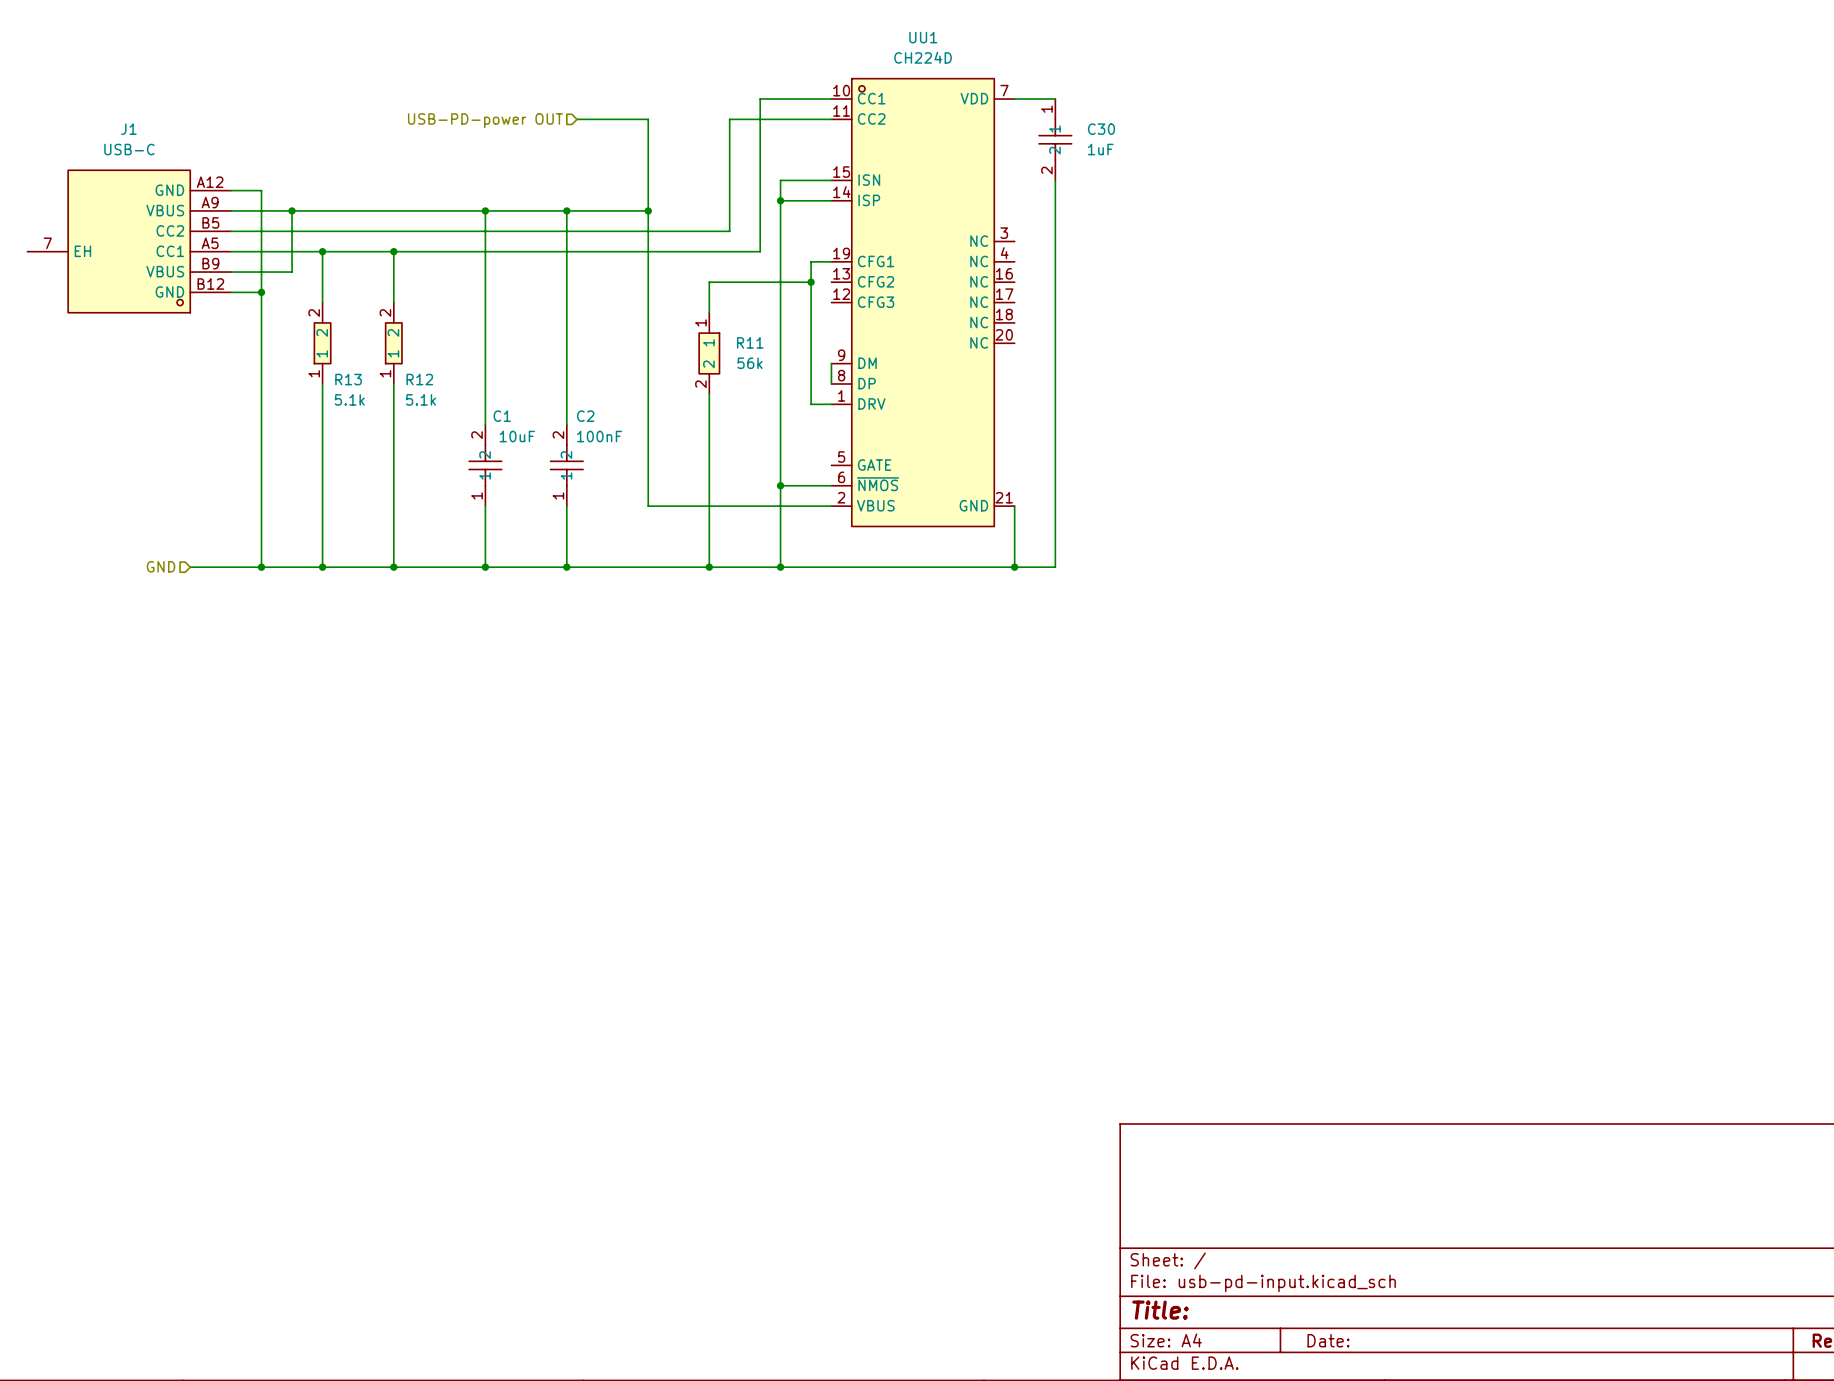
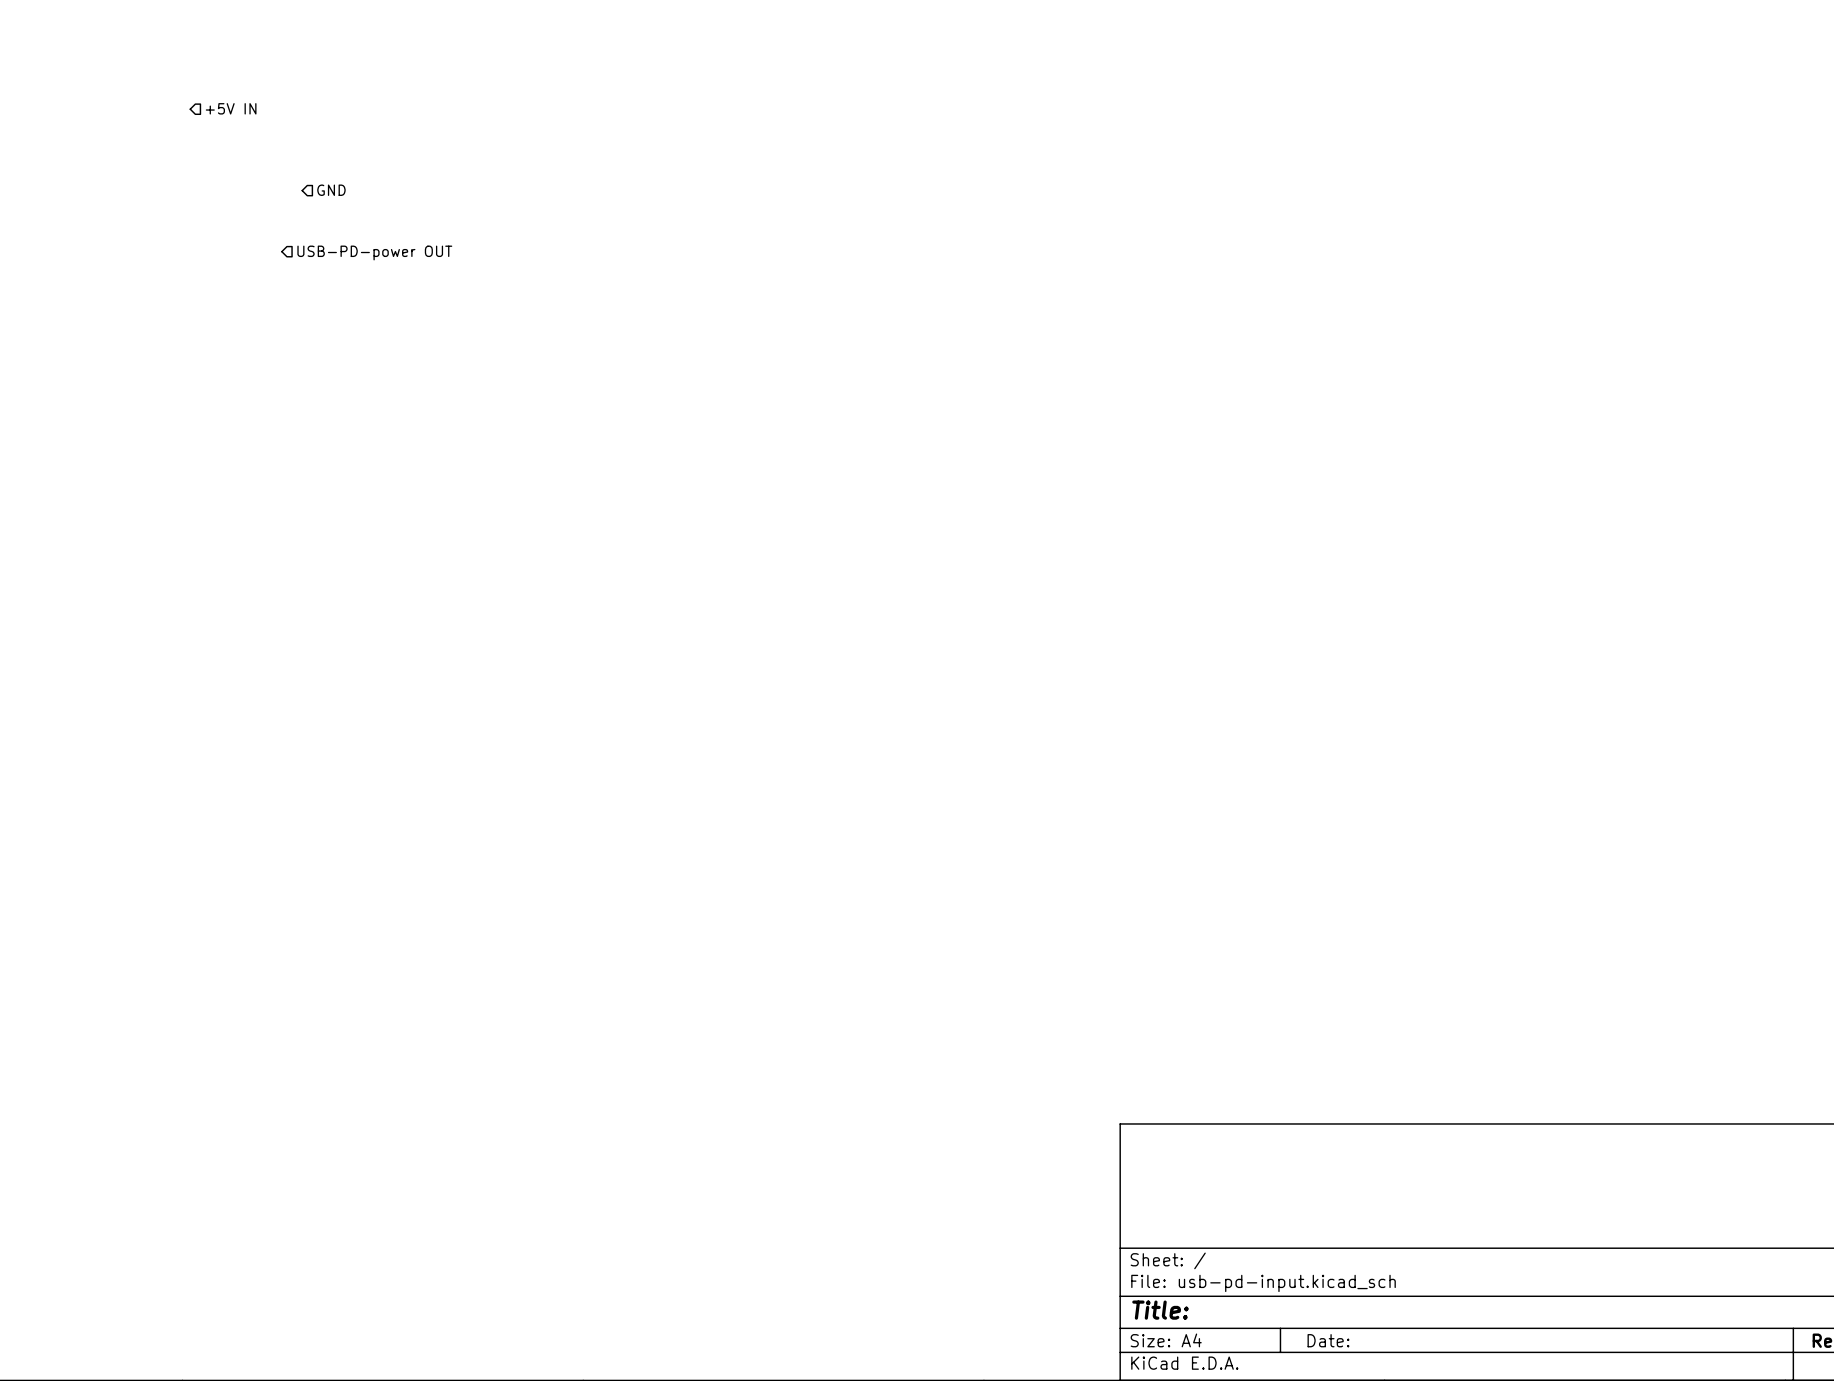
wire: (831, 99) (760, 99) (760, 251) (230, 251) -> none
wire: (1014, 99) (1055, 99) -> none
hierarchical label: none -> +5V IN (231, 108)
wire: (577, 119) (648, 119) (648, 506) (831, 506) -> none
wire: (831, 119) (729, 119) (729, 231) (230, 231) -> none
hierarchical label: USB-PD-power OUT (485, 120) -> none
C30: 1uF (1055, 139) -> none
wire: (831, 180) (780, 180) (780, 567) -> none
wire: (1055, 180) (1055, 567) (190, 567) -> none
wire: (230, 190) (261, 190) (261, 567) -> none
hierarchical label: none -> GND (331, 190)
wire: (780, 200) (831, 200) -> none
junction: (780, 200) -> none
wire: (230, 210) (648, 210) -> none
wire: (292, 210) (292, 272) (230, 272) -> none
junction: (292, 210) -> none
wire: (485, 210) (485, 424) -> none
junction: (485, 210) -> none
wire: (566, 210) (566, 424) -> none
junction: (566, 210) -> none
junction: (648, 210) -> none
J1: USB-C (129, 241) -> none
wire: (322, 251) (322, 302) -> none
junction: (322, 251) -> none
wire: (393, 251) (393, 302) -> none
junction: (393, 251) -> none
hierarchical label: none -> USB-PD-power OUT (374, 252)
wire: (831, 261) (811, 261) (811, 404) (831, 404) -> none
wire: (811, 282) (709, 282) (709, 312) -> none
junction: (811, 282) -> none
wire: (230, 292) (261, 292) -> none
junction: (261, 292) -> none
UU1: CH224D (923, 302) -> none
R13: 5.1k (322, 343) -> none
R12: 5.1k (393, 343) -> none
R11: 56k (709, 353) -> none
wire: (831, 363) (831, 383) -> none
wire: (322, 383) (322, 567) -> none
wire: (393, 383) (393, 567) -> none
wire: (709, 394) (709, 567) -> none
C1: 10uF (485, 465) -> none
C2: 100nF (566, 465) -> none
wire: (780, 485) (831, 485) -> none
junction: (780, 485) -> none
wire: (485, 506) (485, 567) -> none
wire: (566, 506) (566, 567) -> none
wire: (1014, 506) (1014, 567) -> none
hierarchical label: GND (161, 566) -> none
junction: (261, 567) -> none
junction: (322, 567) -> none
junction: (393, 567) -> none
junction: (485, 567) -> none
junction: (566, 567) -> none
junction: (709, 567) -> none
junction: (780, 567) -> none
junction: (1014, 567) -> none

